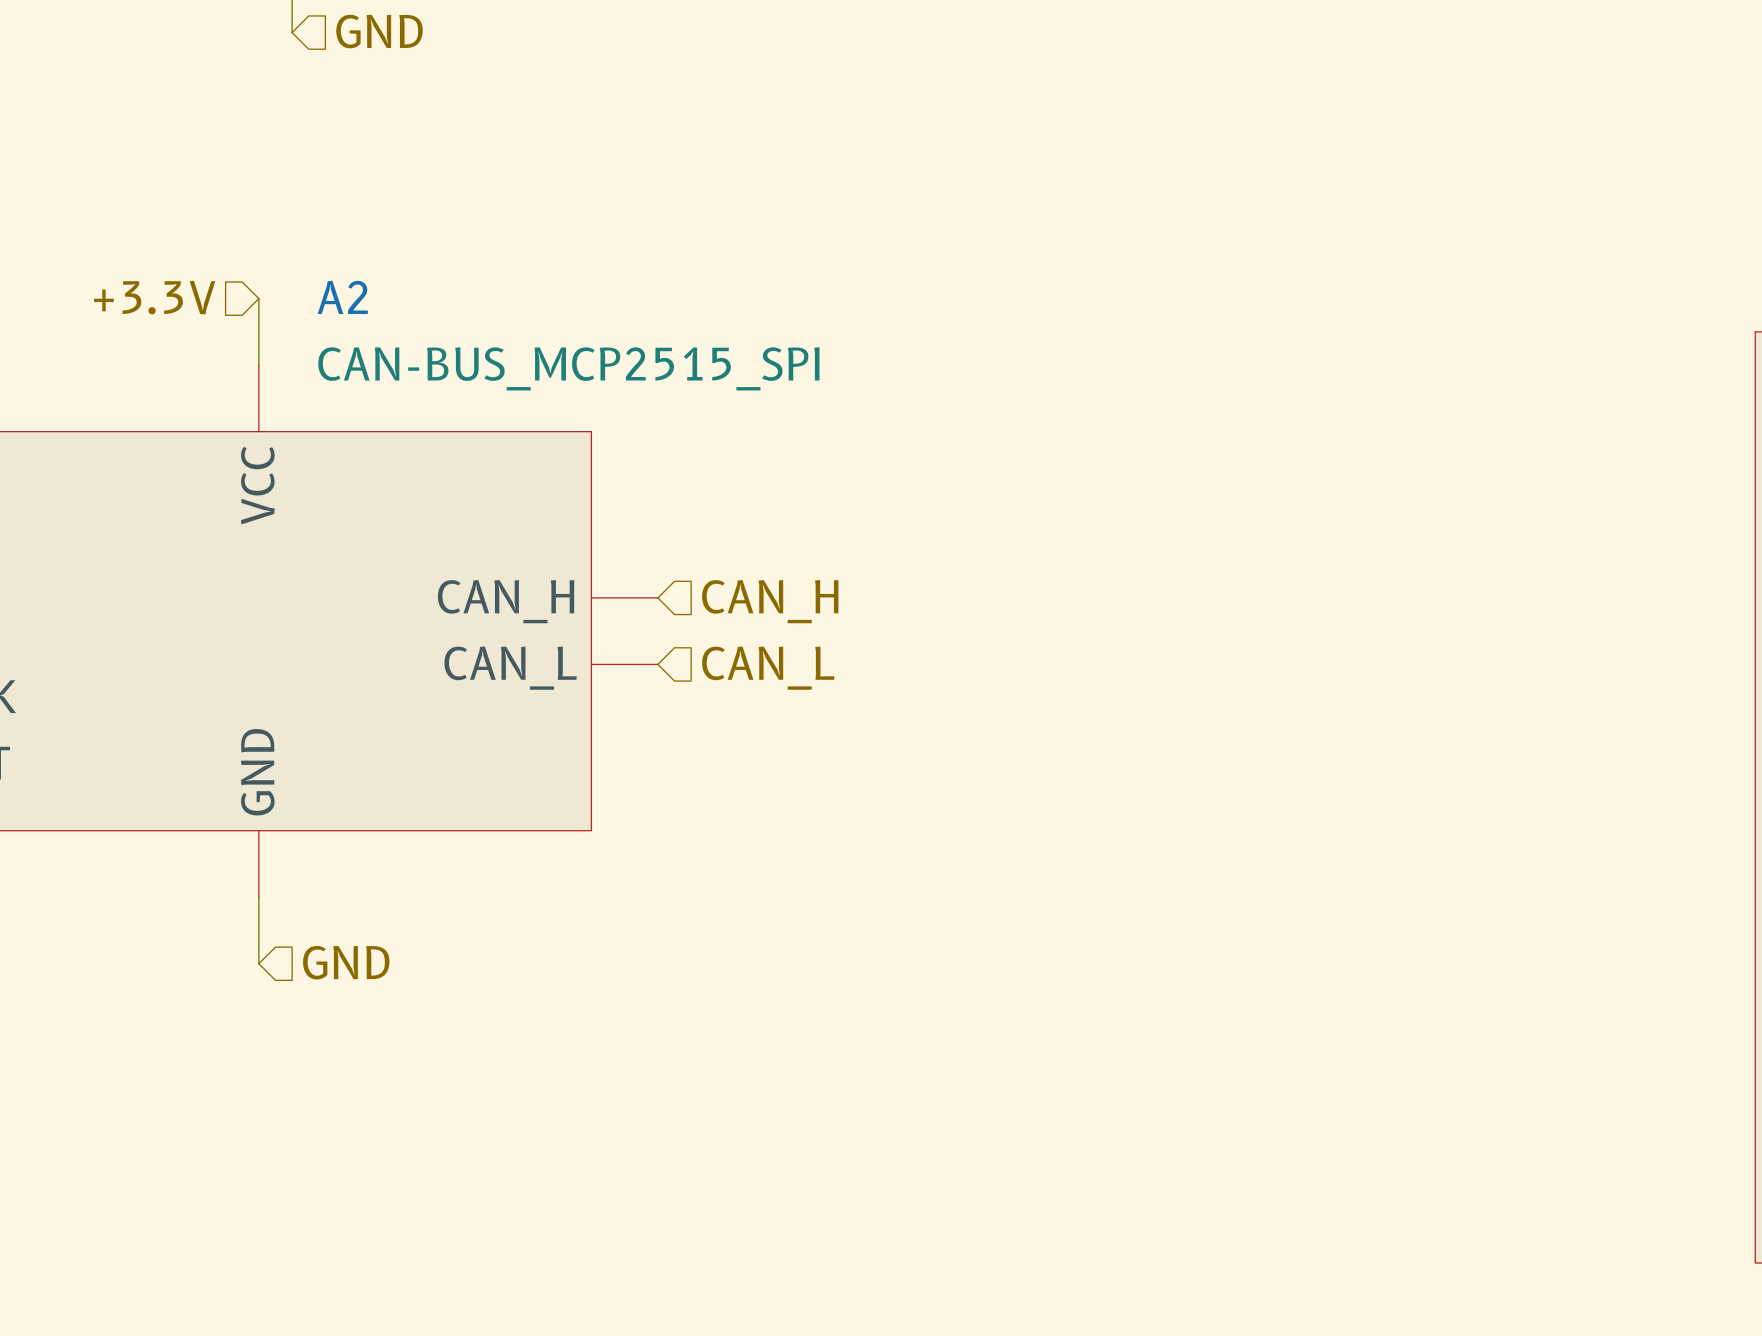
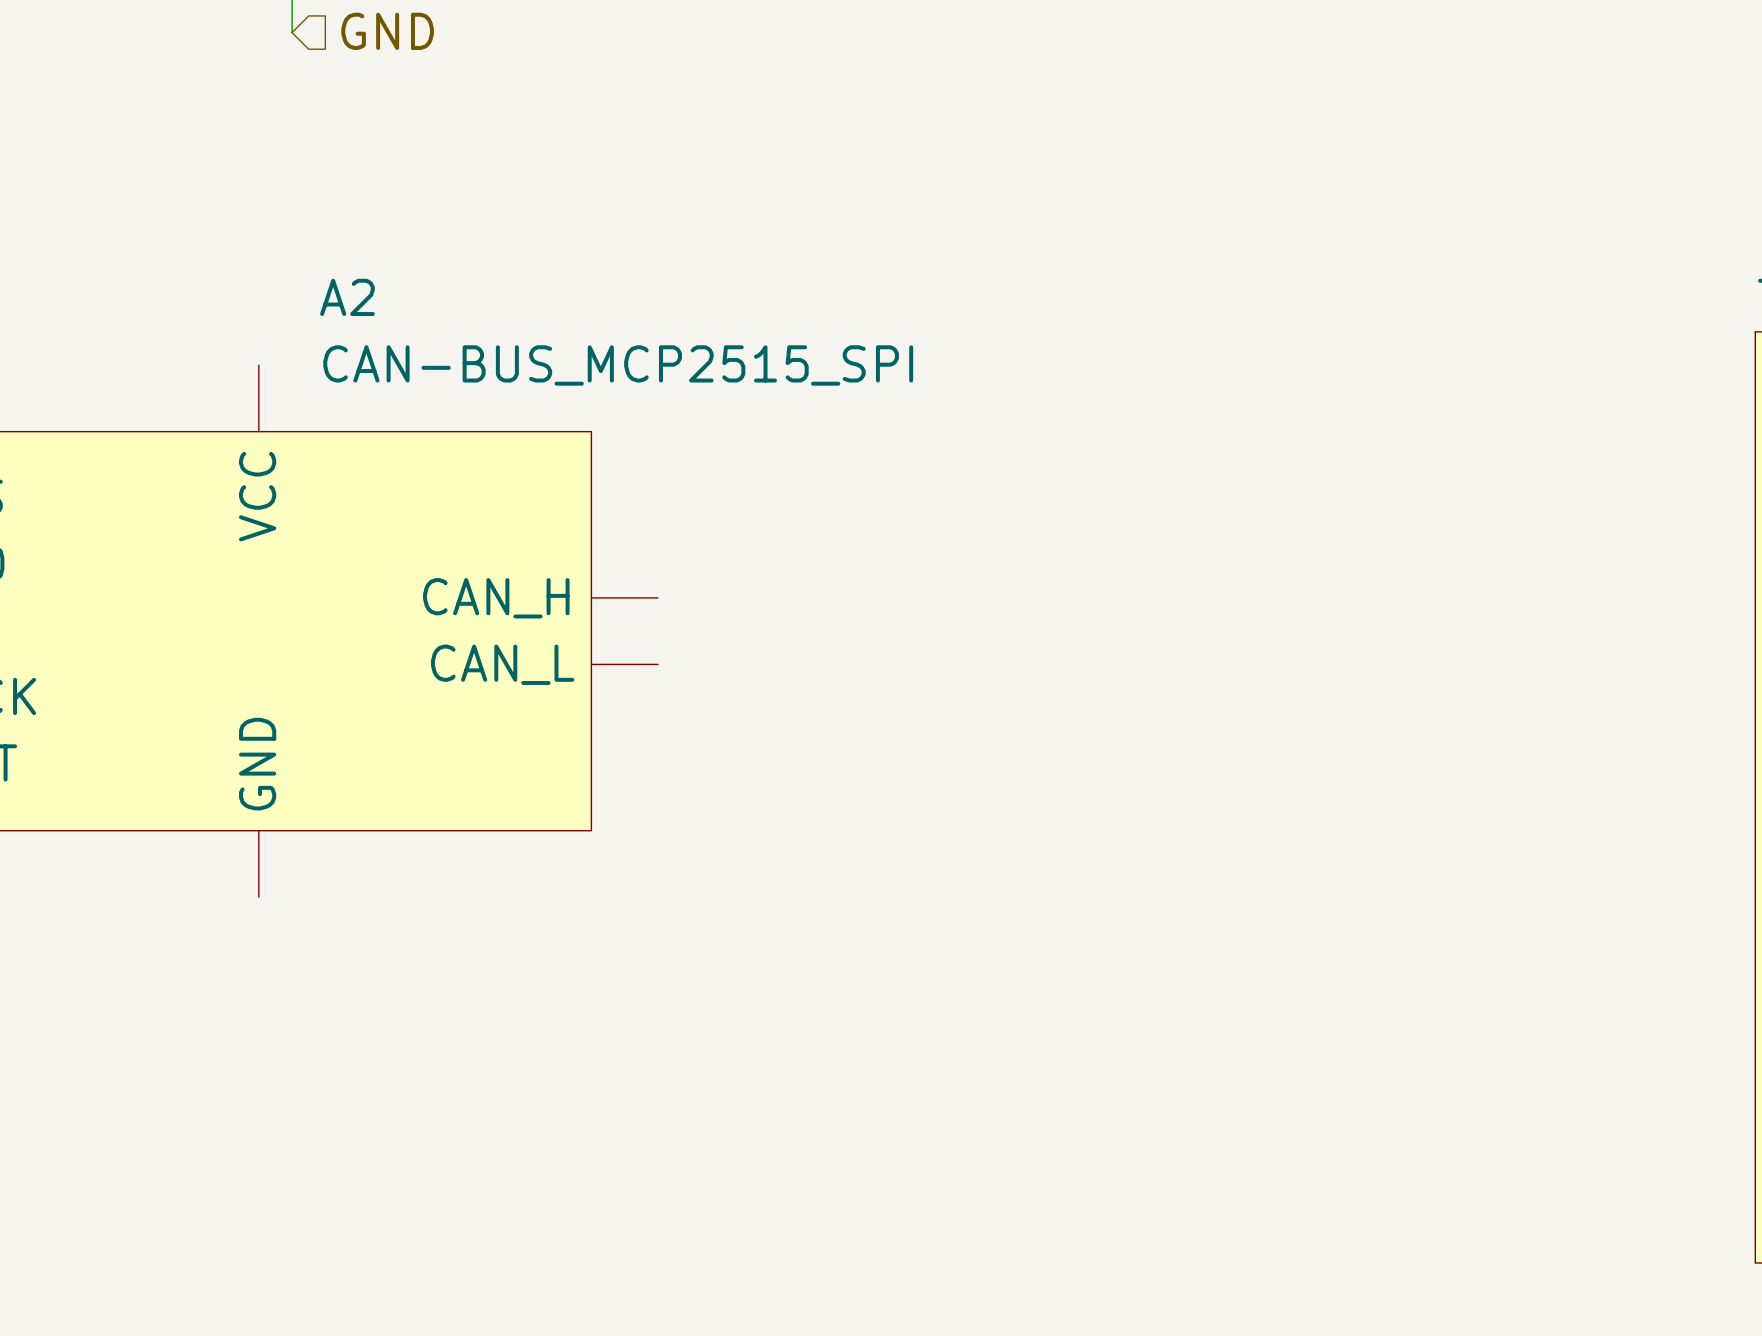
hierarchical label: +3.3V (154, 297) -> none
wire: (258, 298) (258, 365) -> none
hierarchical label: CAN_H (770, 601) -> none
hierarchical label: CAN_L (768, 668) -> none
wire: (258, 897) (258, 963) -> none
hierarchical label: GND (346, 962) -> none

